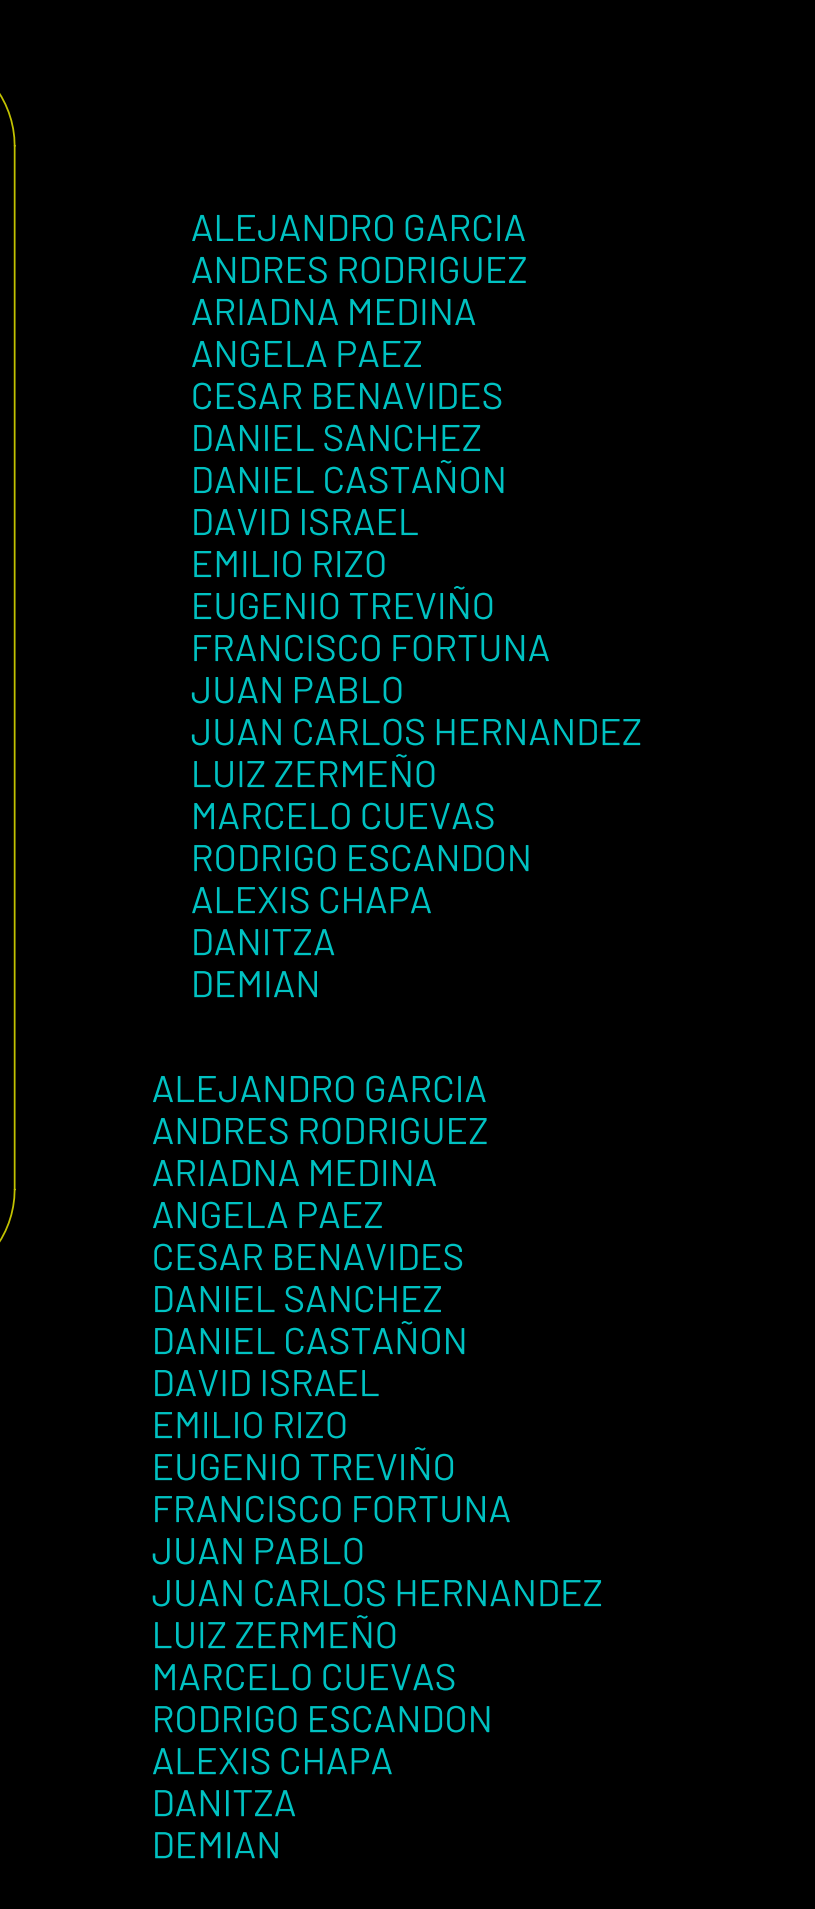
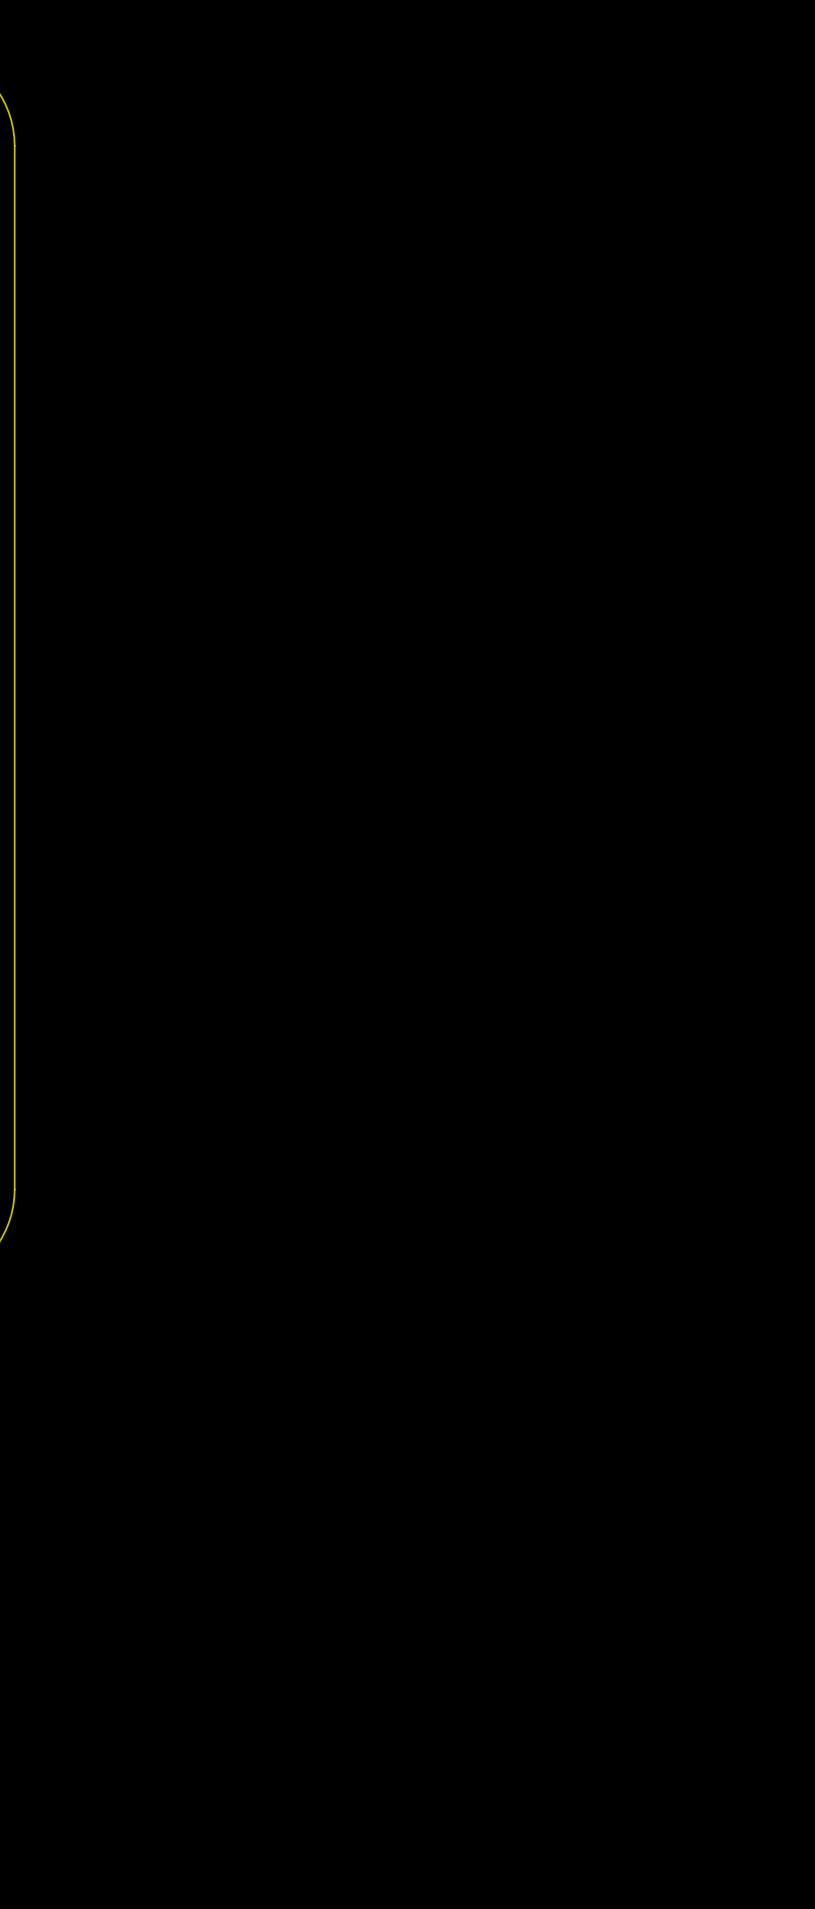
text: ALEJANDRO GARCIA (358, 227) -> none
text: ANDRES RODRIGUEZ (358, 269) -> none
text: ARIADNA MEDINA (333, 311) -> none
text: ANGELA PAEZ (306, 353) -> none
text: CESAR BENAVIDES (347, 396) -> none
text: DANIEL SANCHEZ (337, 438) -> none
text: DANIEL CASTAÑON (348, 476) -> none
text: DAVID ISRAEL (306, 522) -> none
text: EMILIO RIZO (289, 564) -> none
text: EUGENIO TREVIÑO (343, 602) -> none
text: FRANCISCO FORTUNA (371, 648) -> none
text: JUAN PABLO (296, 690) -> none
text: JUAN CARLOS HERNANDEZ (416, 732) -> none
text: LUIZ ZERMEÑO (314, 770) -> none
text: MARCELO CUEVAS (343, 816) -> none
text: RODRIGO ESCANDON (361, 858) -> none
text: ALEXIS CHAPA (311, 900) -> none
text: DANITZA (264, 942) -> none
text: DEMIAN (255, 984) -> none
text: ALEJANDRO GARCIA (319, 1089) -> none
text: ANDRES RODRIGUEZ (319, 1131) -> none
text: ARIADNA MEDINA (294, 1173) -> none
text: ANGELA PAEZ (267, 1215) -> none
text: CESAR BENAVIDES (308, 1257) -> none
text: DANIEL SANCHEZ (298, 1299) -> none
text: DANIEL CASTAÑON (309, 1337) -> none
text: DAVID ISRAEL (266, 1383) -> none
text: EMILIO RIZO (250, 1425) -> none
text: EUGENIO TREVIÑO (304, 1463) -> none
text: FRANCISCO FORTUNA (332, 1509) -> none
text: JUAN PABLO (257, 1551) -> none
text: JUAN CARLOS HERNANDEZ (376, 1593) -> none
text: LUIZ ZERMEÑO (275, 1631) -> none
text: MARCELO CUEVAS (304, 1677) -> none
text: RODRIGO ESCANDON (322, 1719) -> none
text: ALEXIS CHAPA (272, 1761) -> none
text: DANITZA (225, 1803) -> none
text: DEMIAN (216, 1845) -> none

